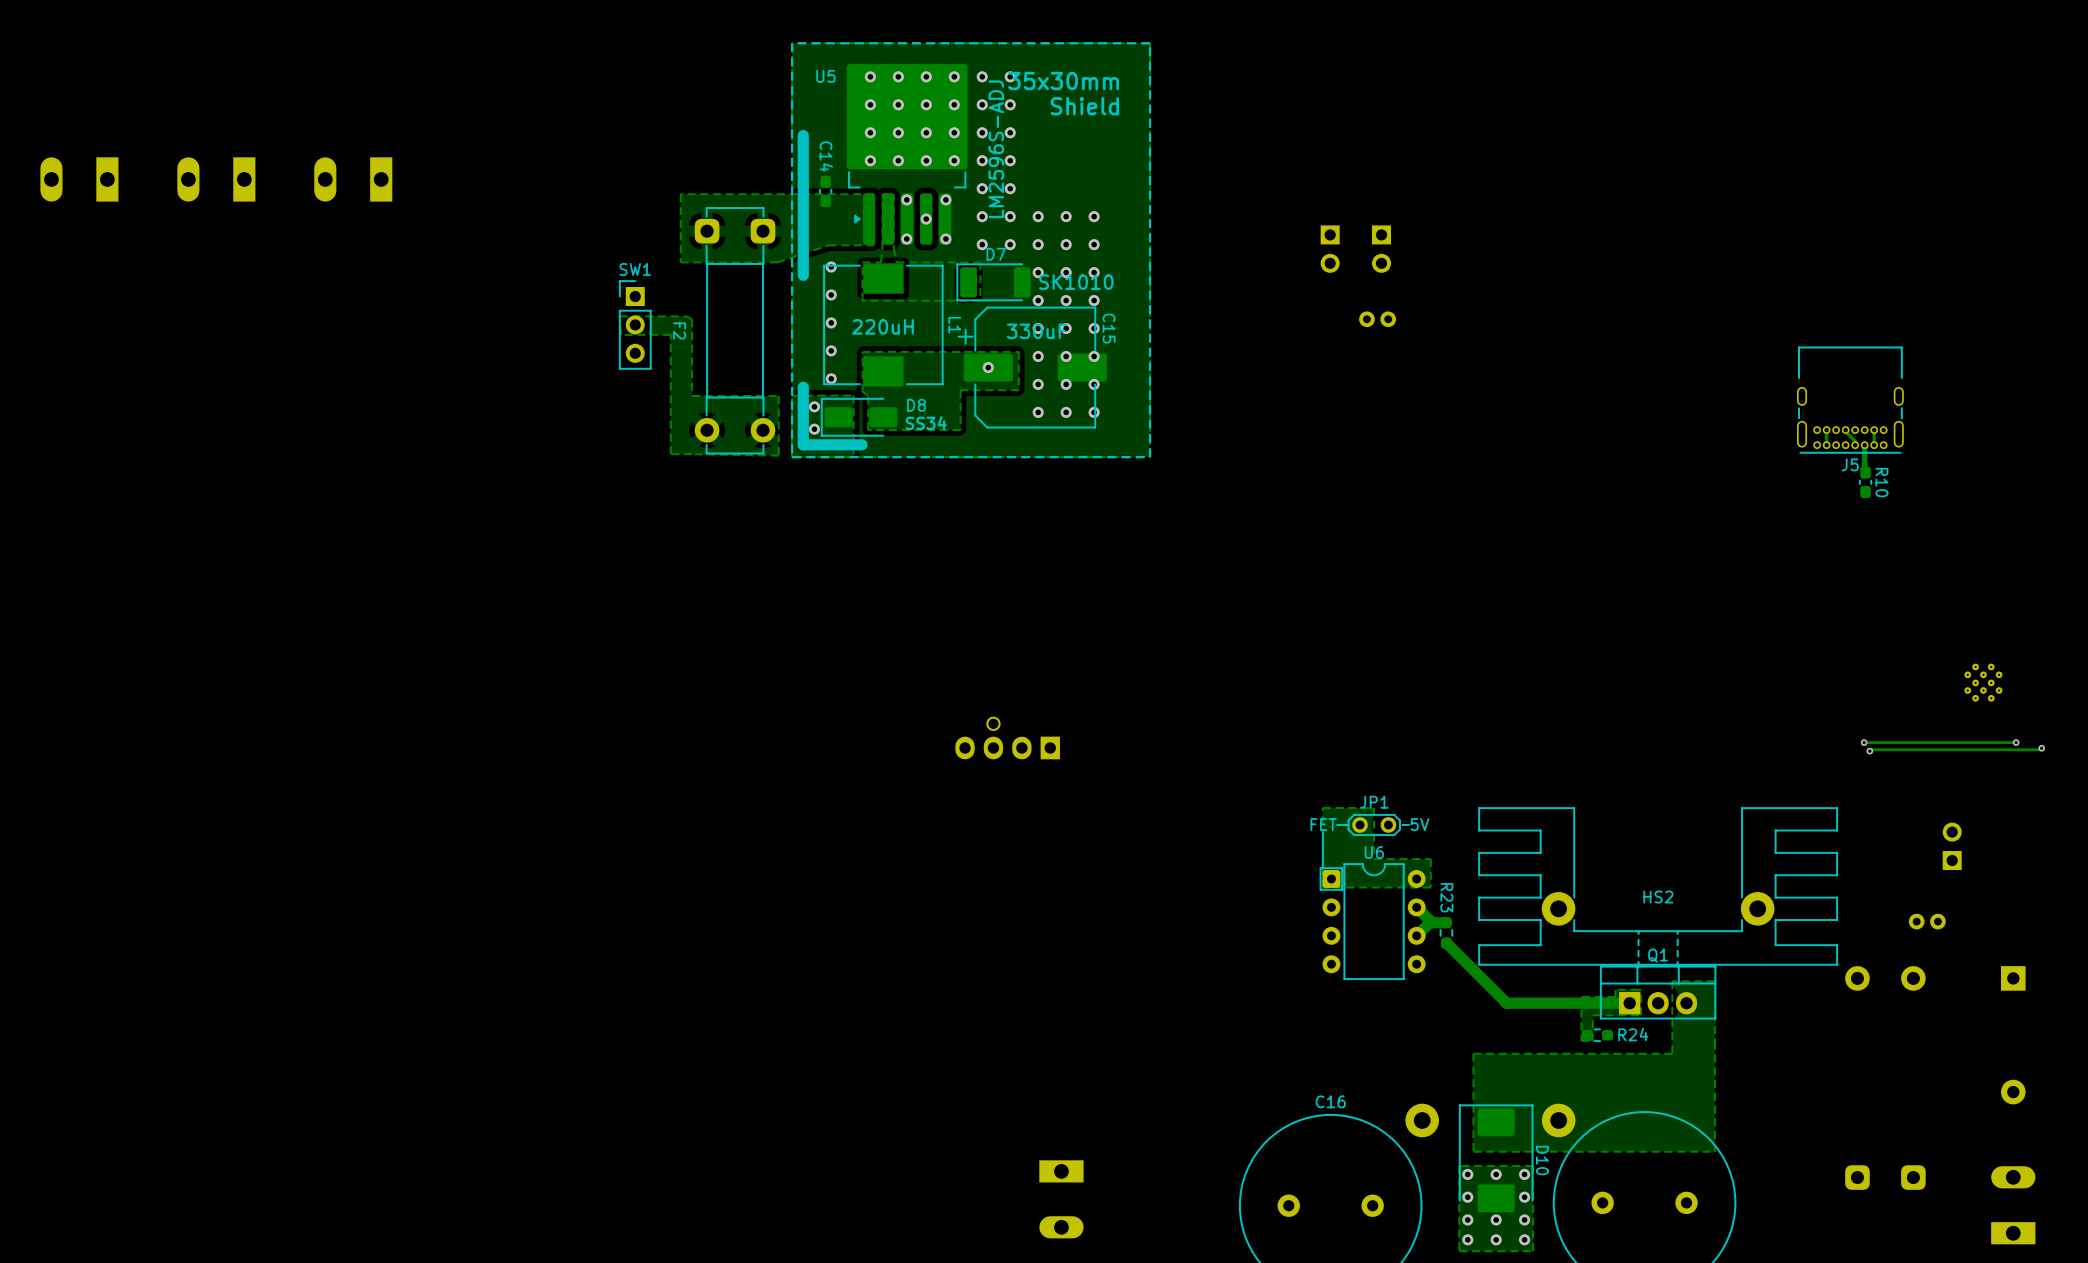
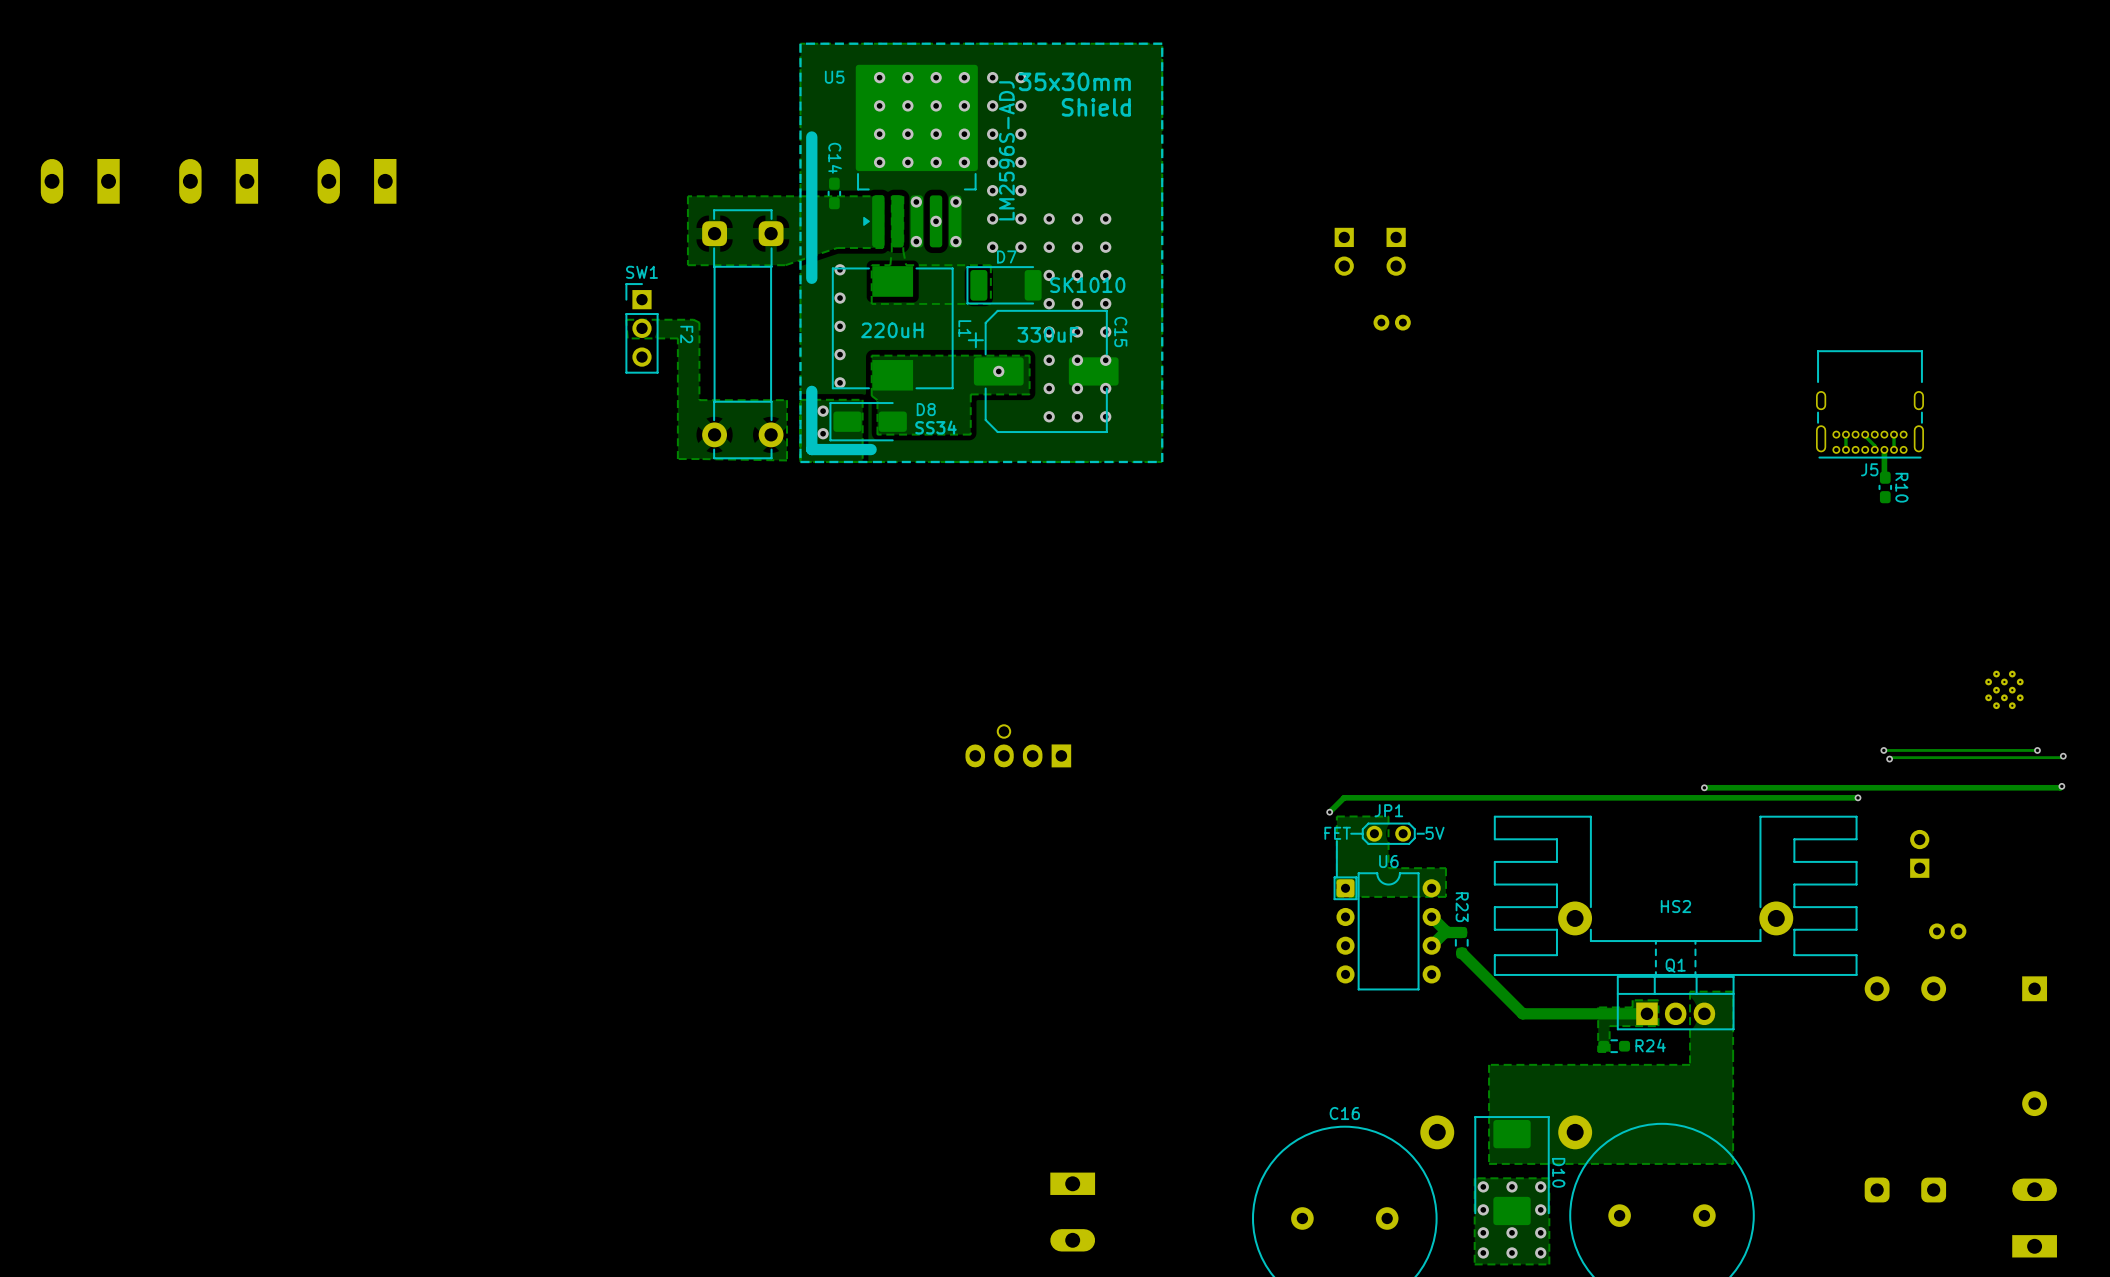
track: none -> (2061, 786) (1704, 787)
via: none -> (2061, 786)
via: none -> (1704, 787)
track: none -> (1858, 797) (1344, 797) (1329, 812)
via: none -> (1858, 797)
via: none -> (1329, 812)
part position: (1952, 846) -> (1919, 853)

